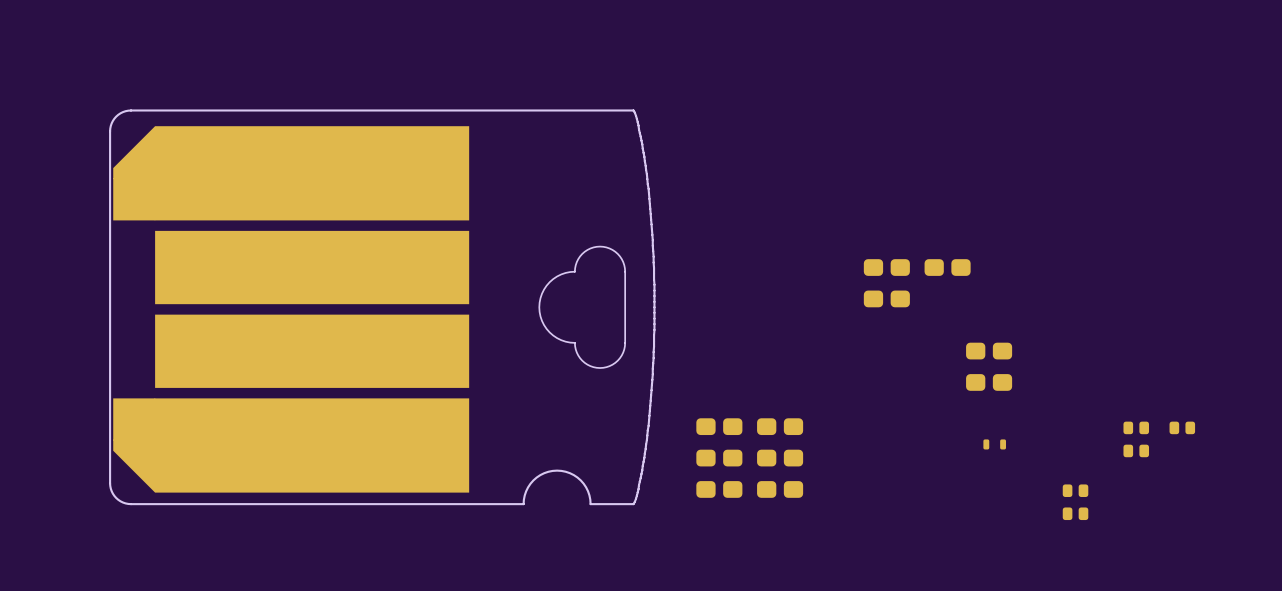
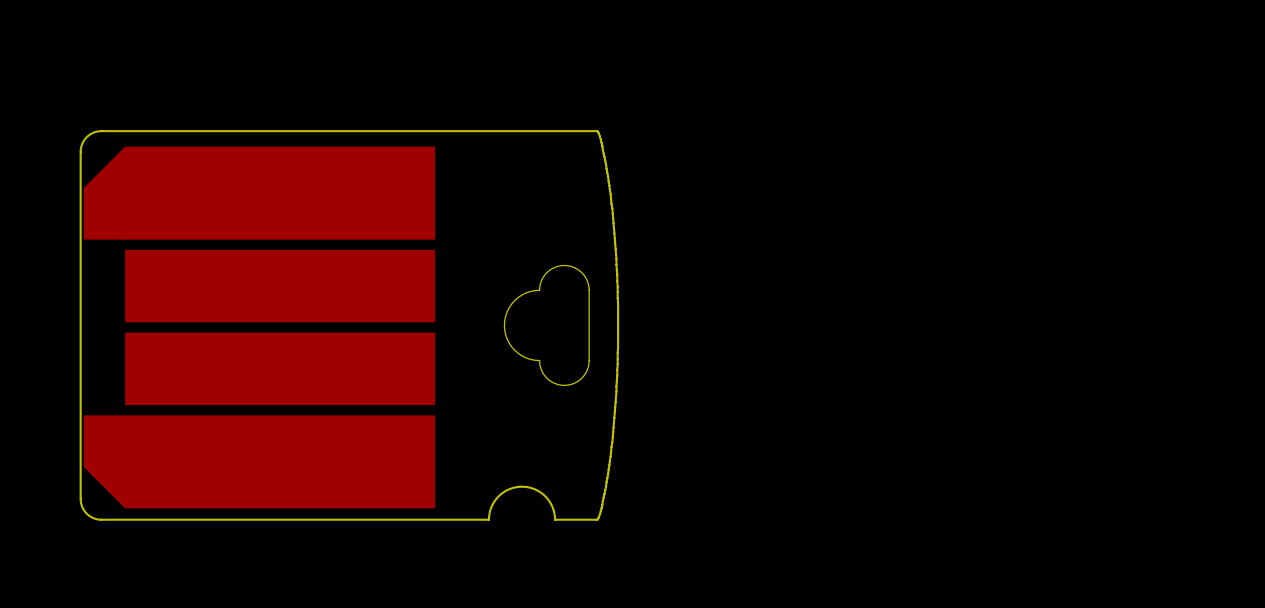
part: (886, 267) -> none
part: (947, 267) -> none
part: (886, 298) -> none
part: (989, 351) -> none
part: (989, 382) -> none
part: (719, 426) -> none
part: (780, 426) -> none
part: (1136, 427) -> none
part: (1182, 427) -> none
part: (994, 444) -> none
part: (1136, 450) -> none
part: (719, 458) -> none
part: (780, 458) -> none
part: (719, 489) -> none
part: (780, 489) -> none
part: (1075, 490) -> none
part: (1075, 513) -> none

